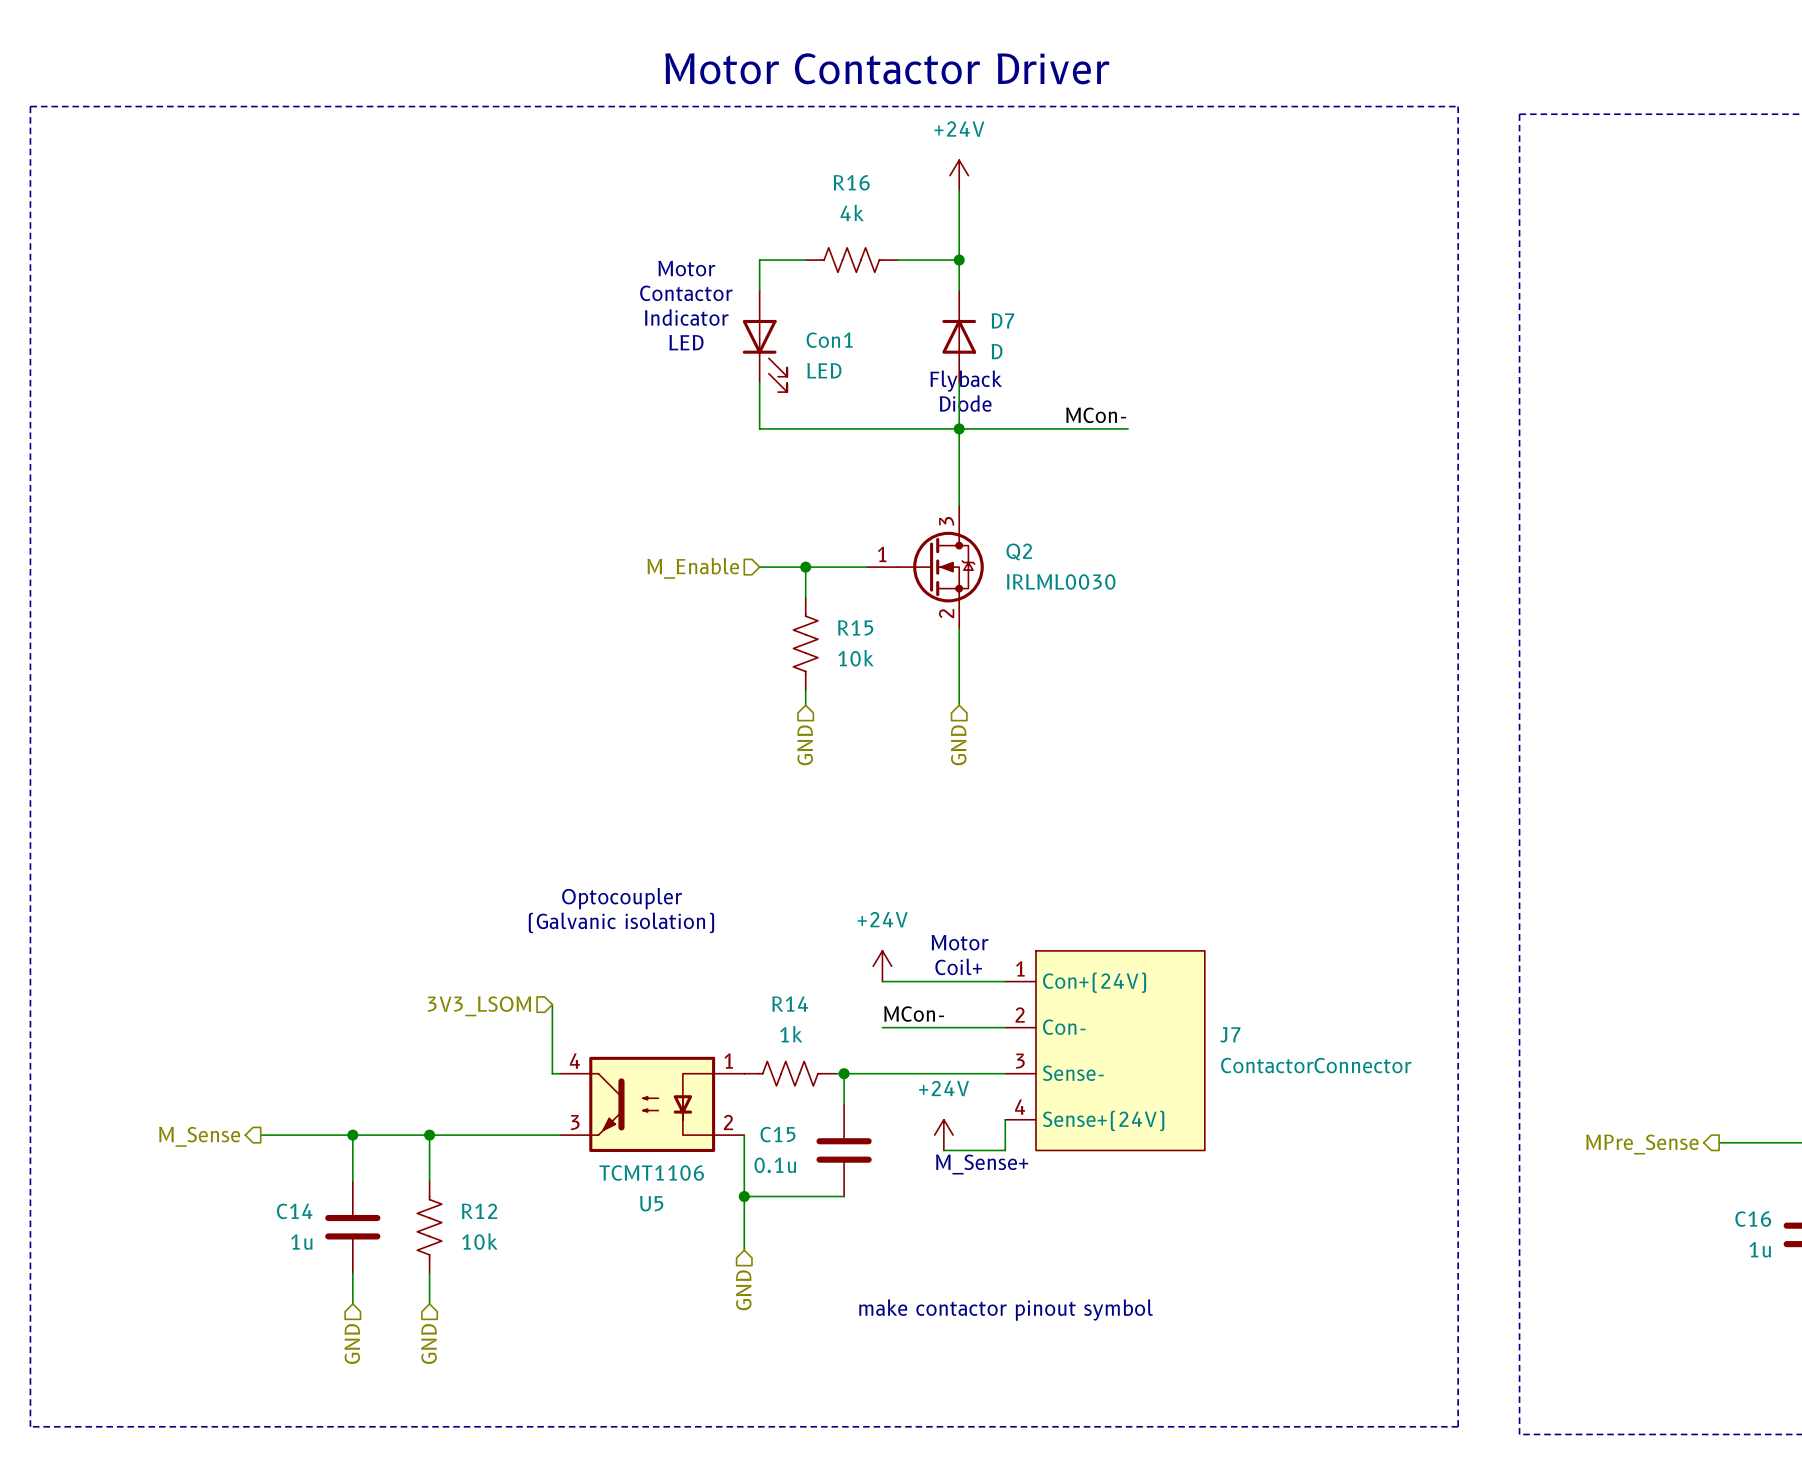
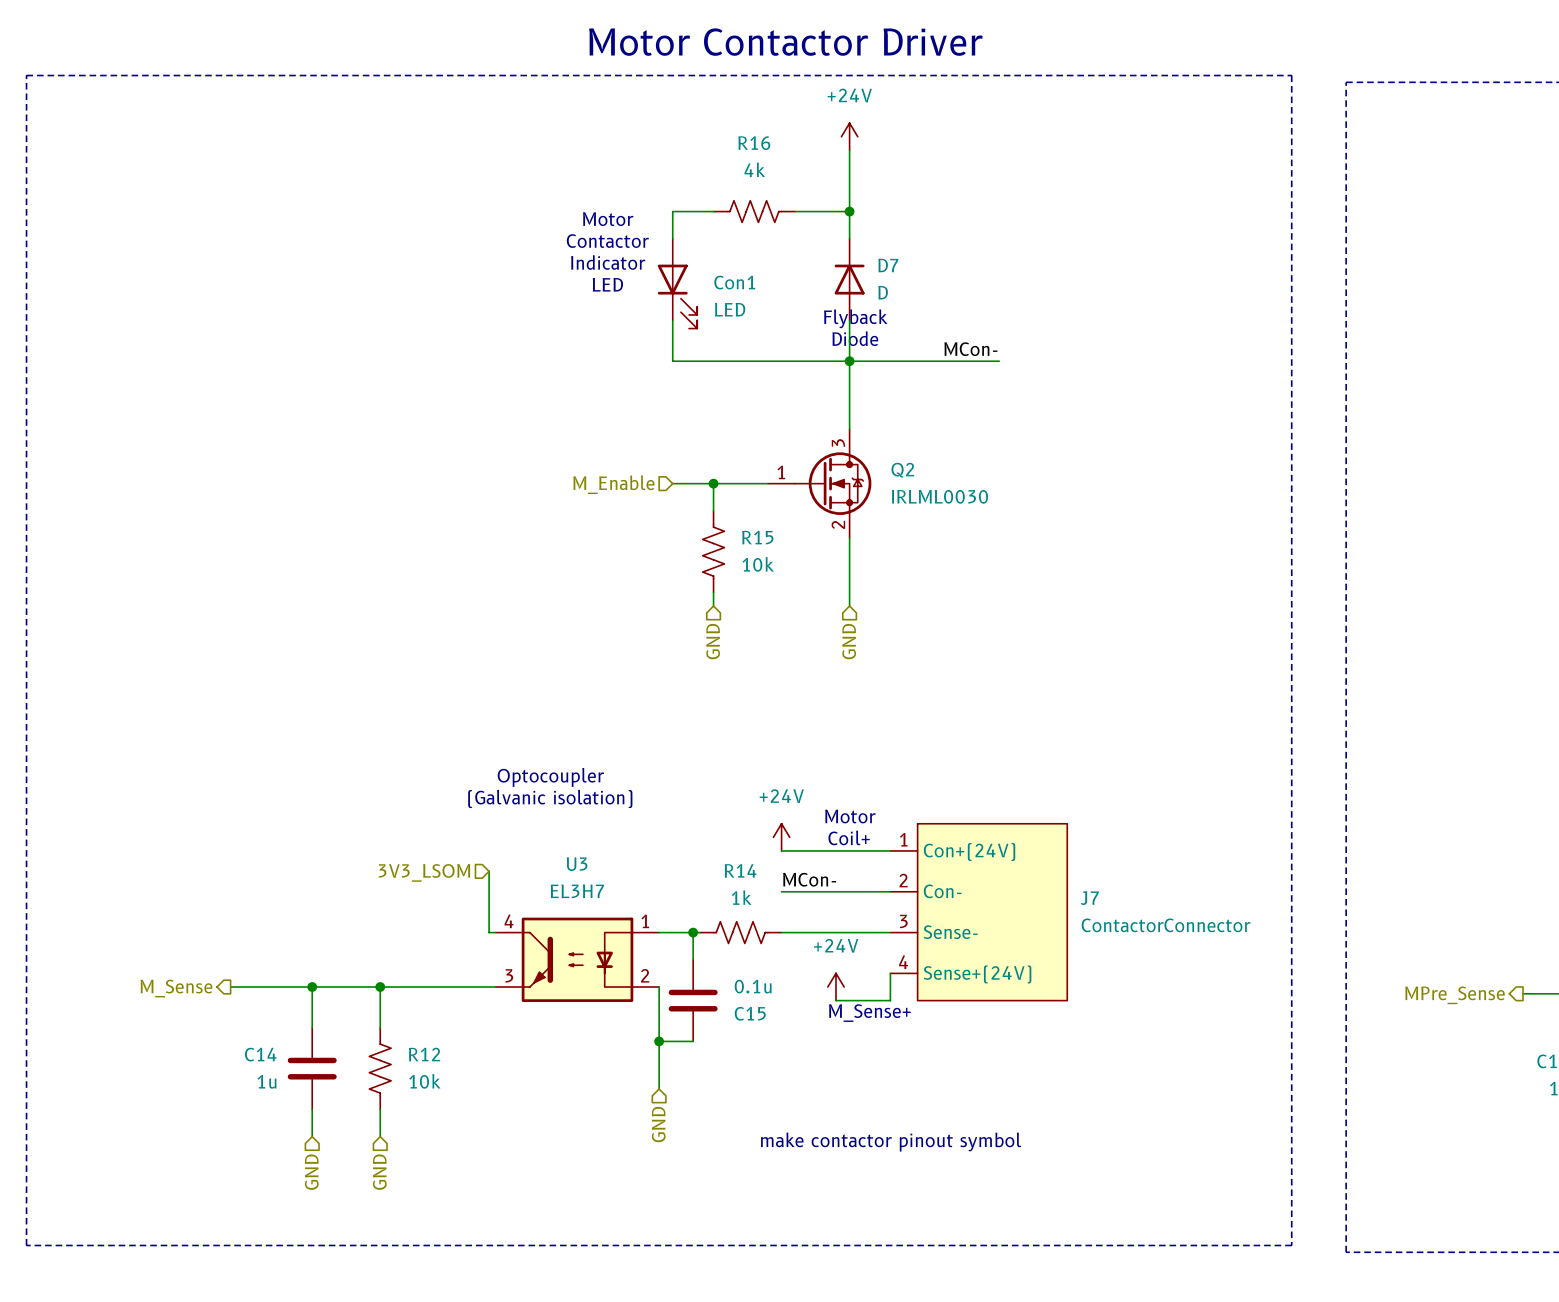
R14 position: (790, 1073) -> (740, 932)
wire: (844, 1073) (844, 1104) -> (693, 932) (693, 959)
junction position: (844, 1073) -> (693, 932)
C15 name position: C15 (778, 1134) -> C15 (750, 1013)
C15 position: (844, 1150) -> (693, 1000)
C15 value position: 0.1u (775, 1165) -> 0.1u (753, 986)
U5 value: TCMT1106 (651, 1173) -> EL3H7 (577, 891)
wire: (782, 1196) (844, 1196) -> none
U5 name: U5 (651, 1203) -> U3 (577, 864)

